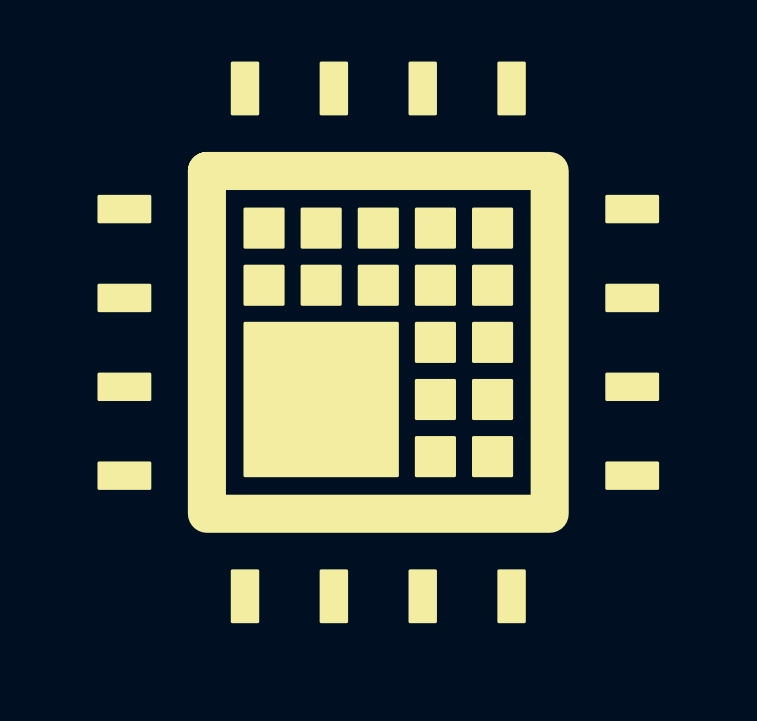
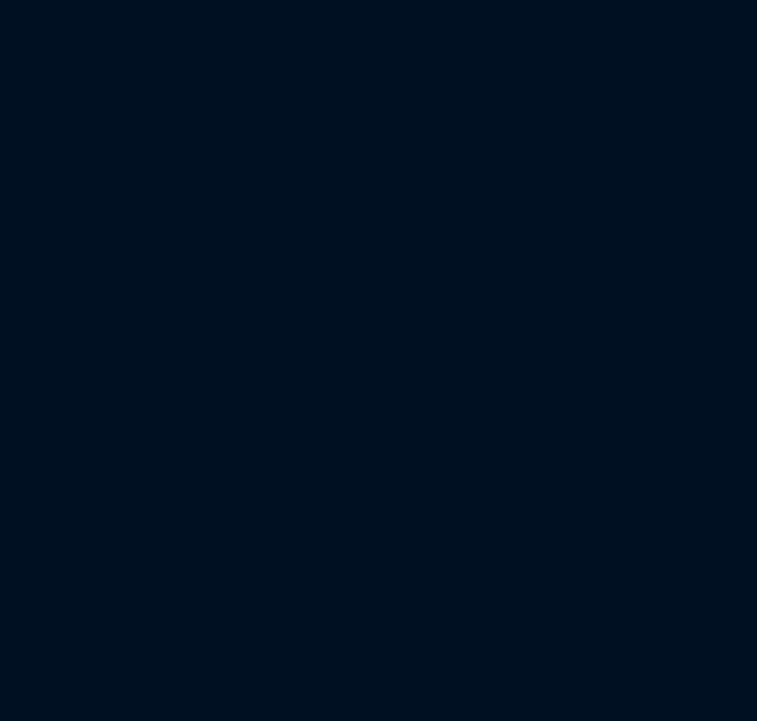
drawing: [97, 61, 660, 624] -> none

